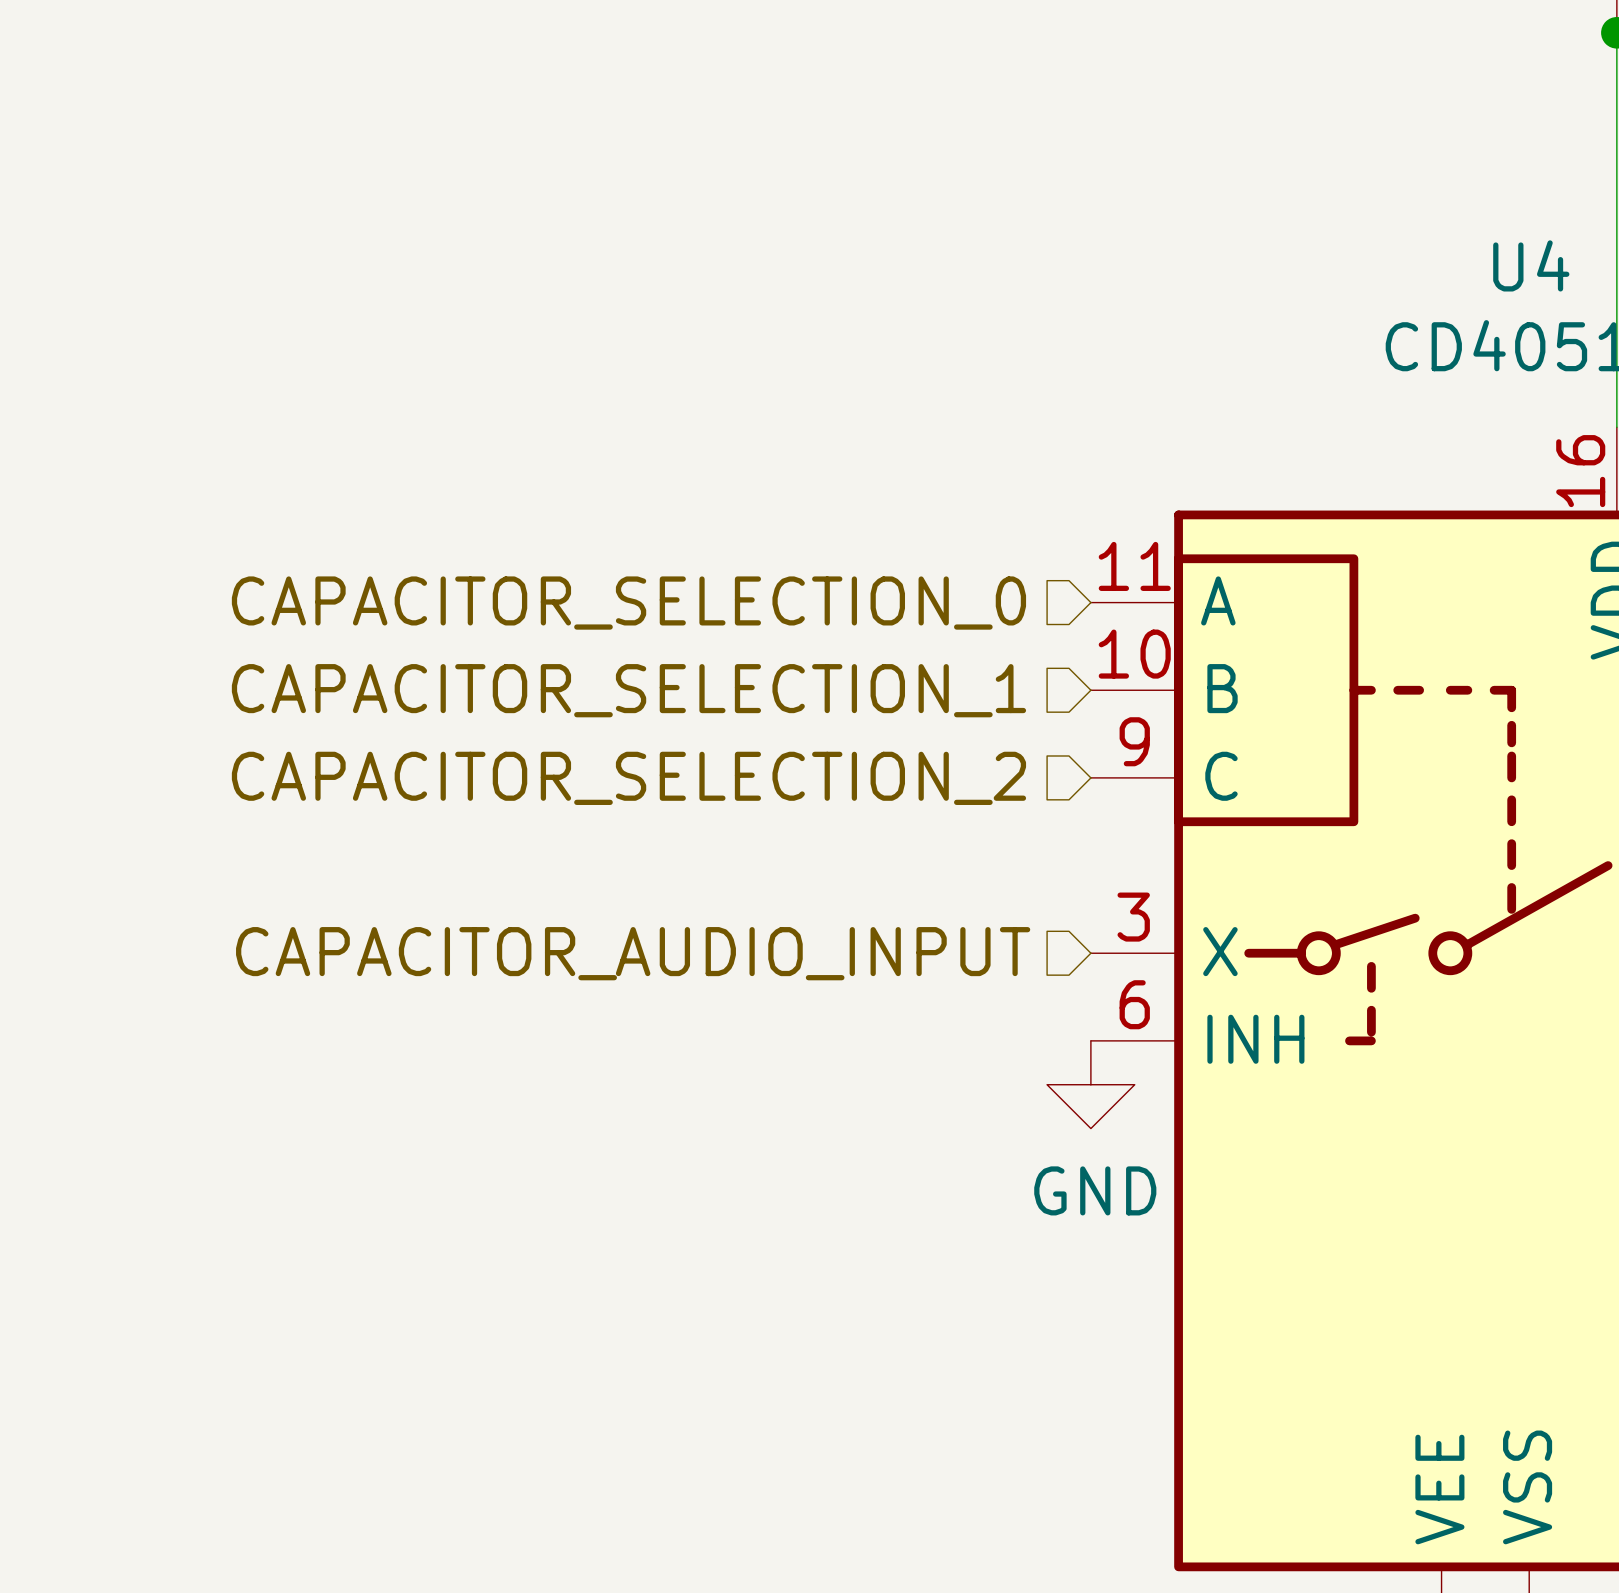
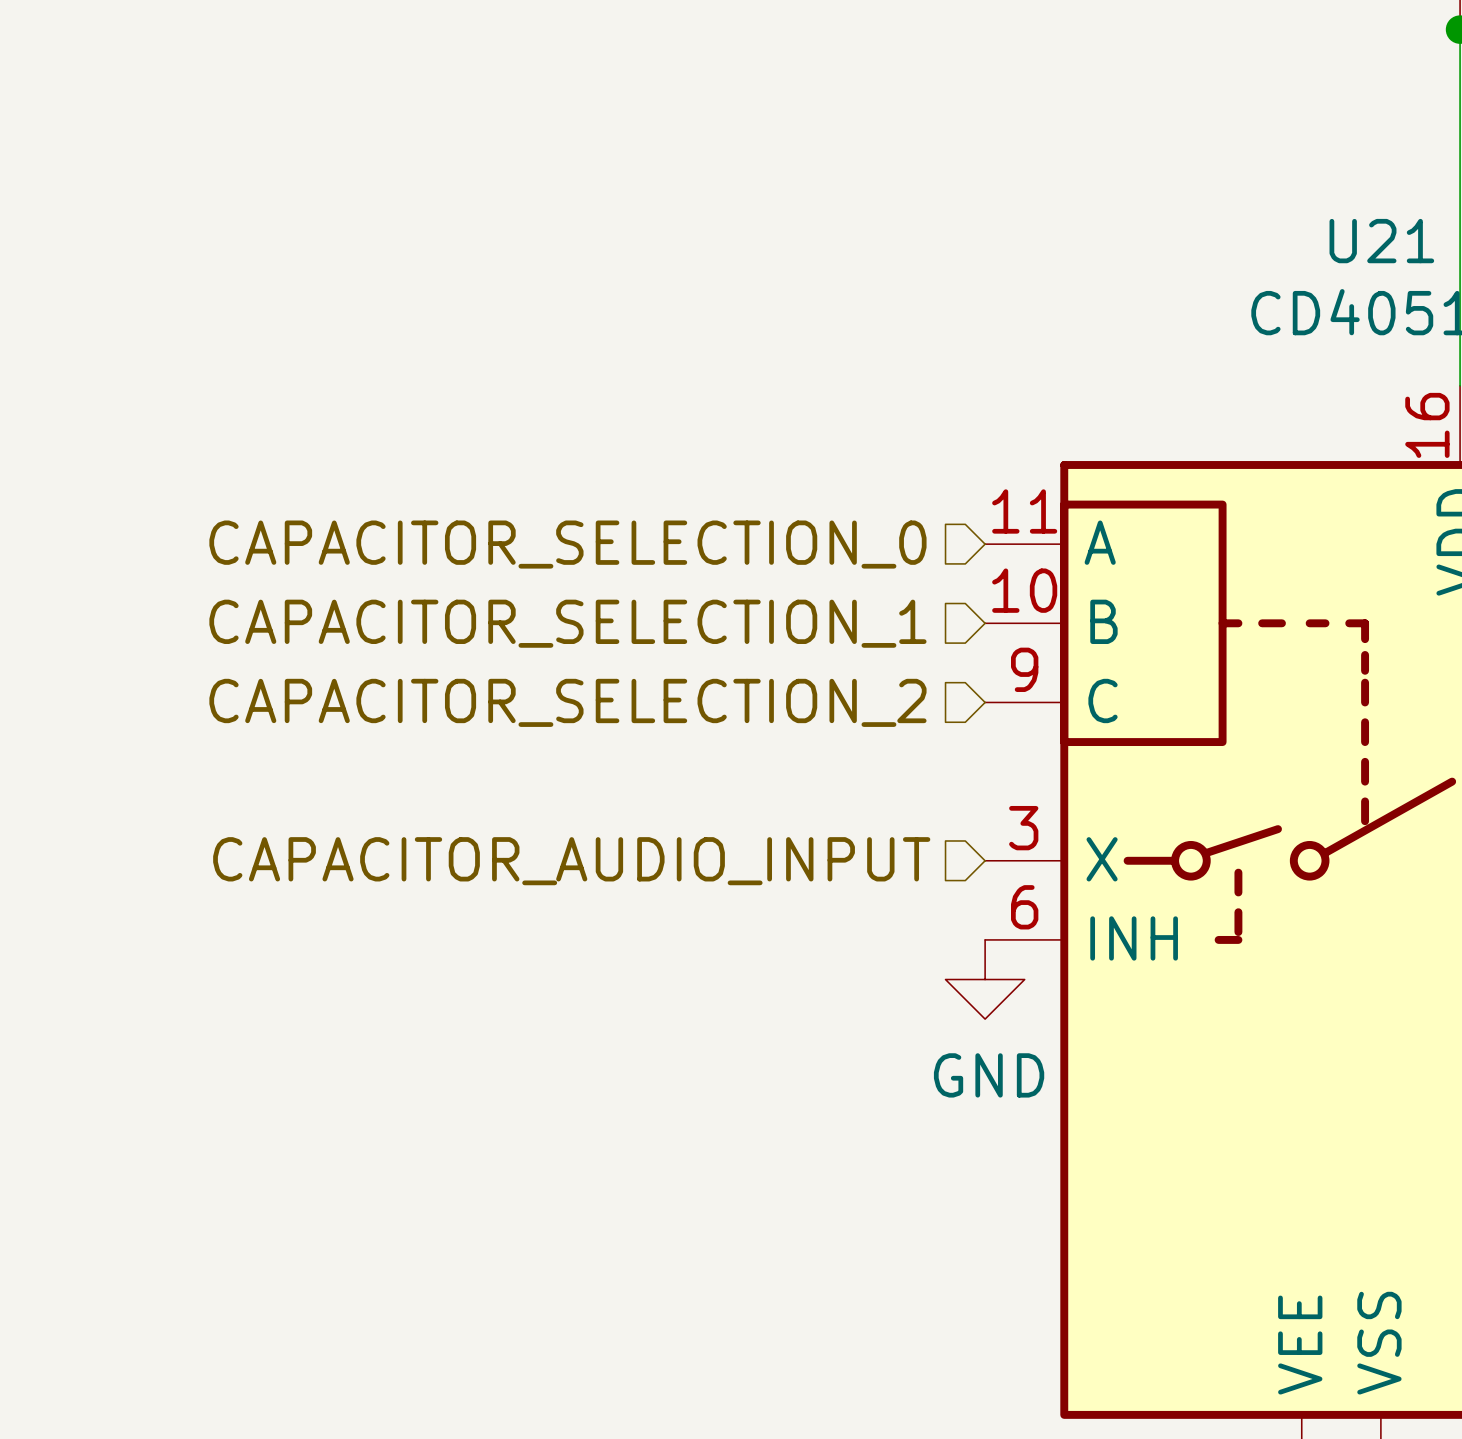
U4 name: U4 (1531, 265) -> U21 (1381, 241)

